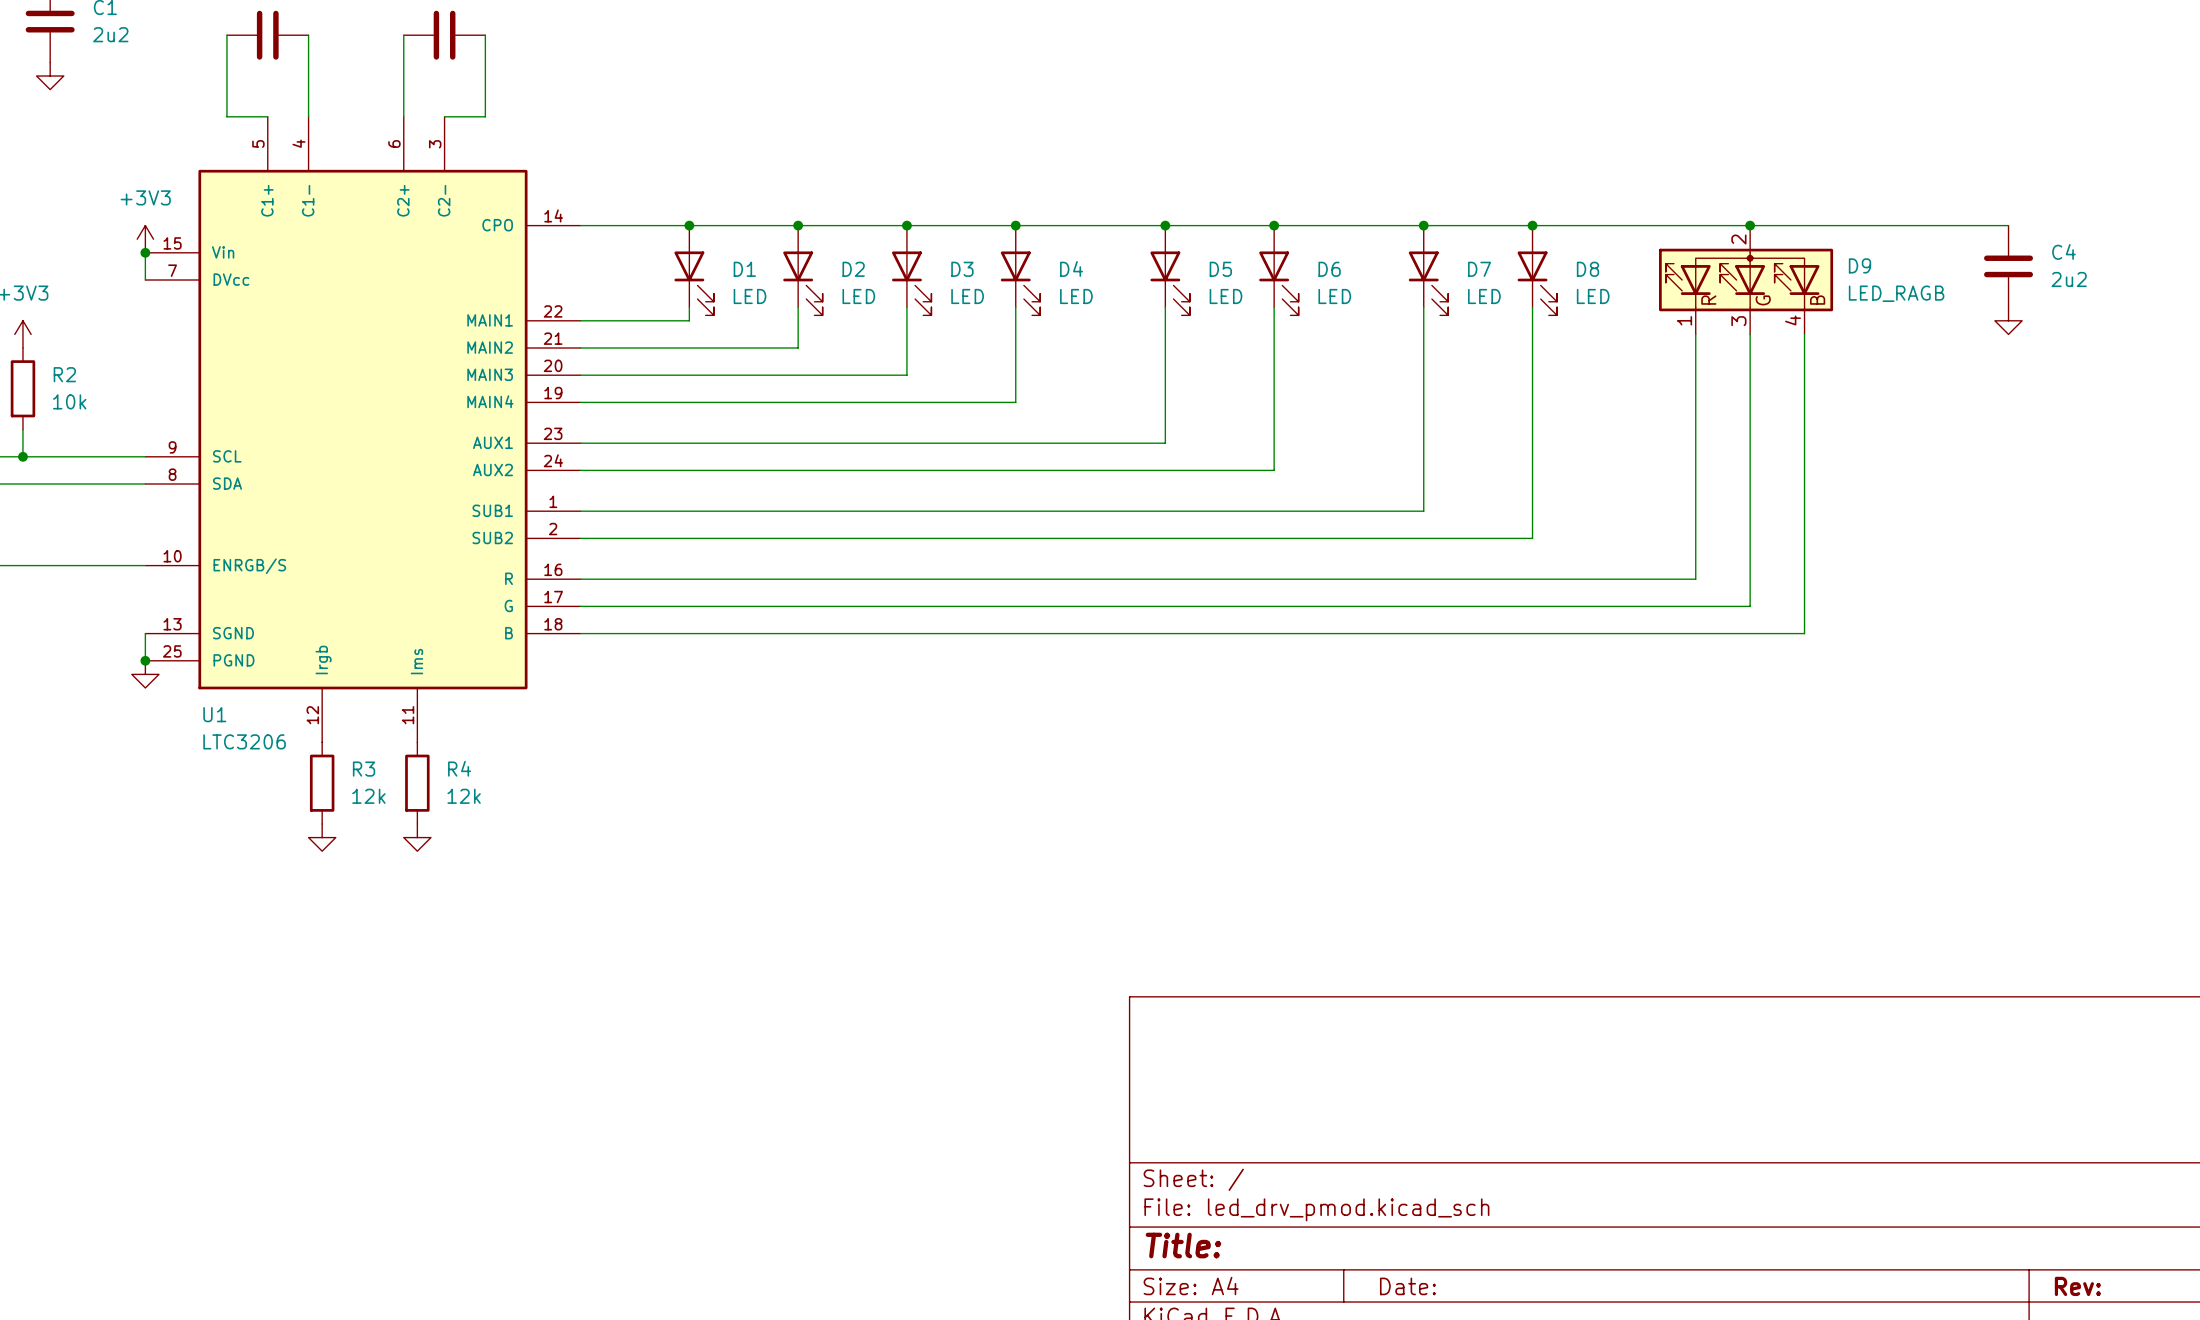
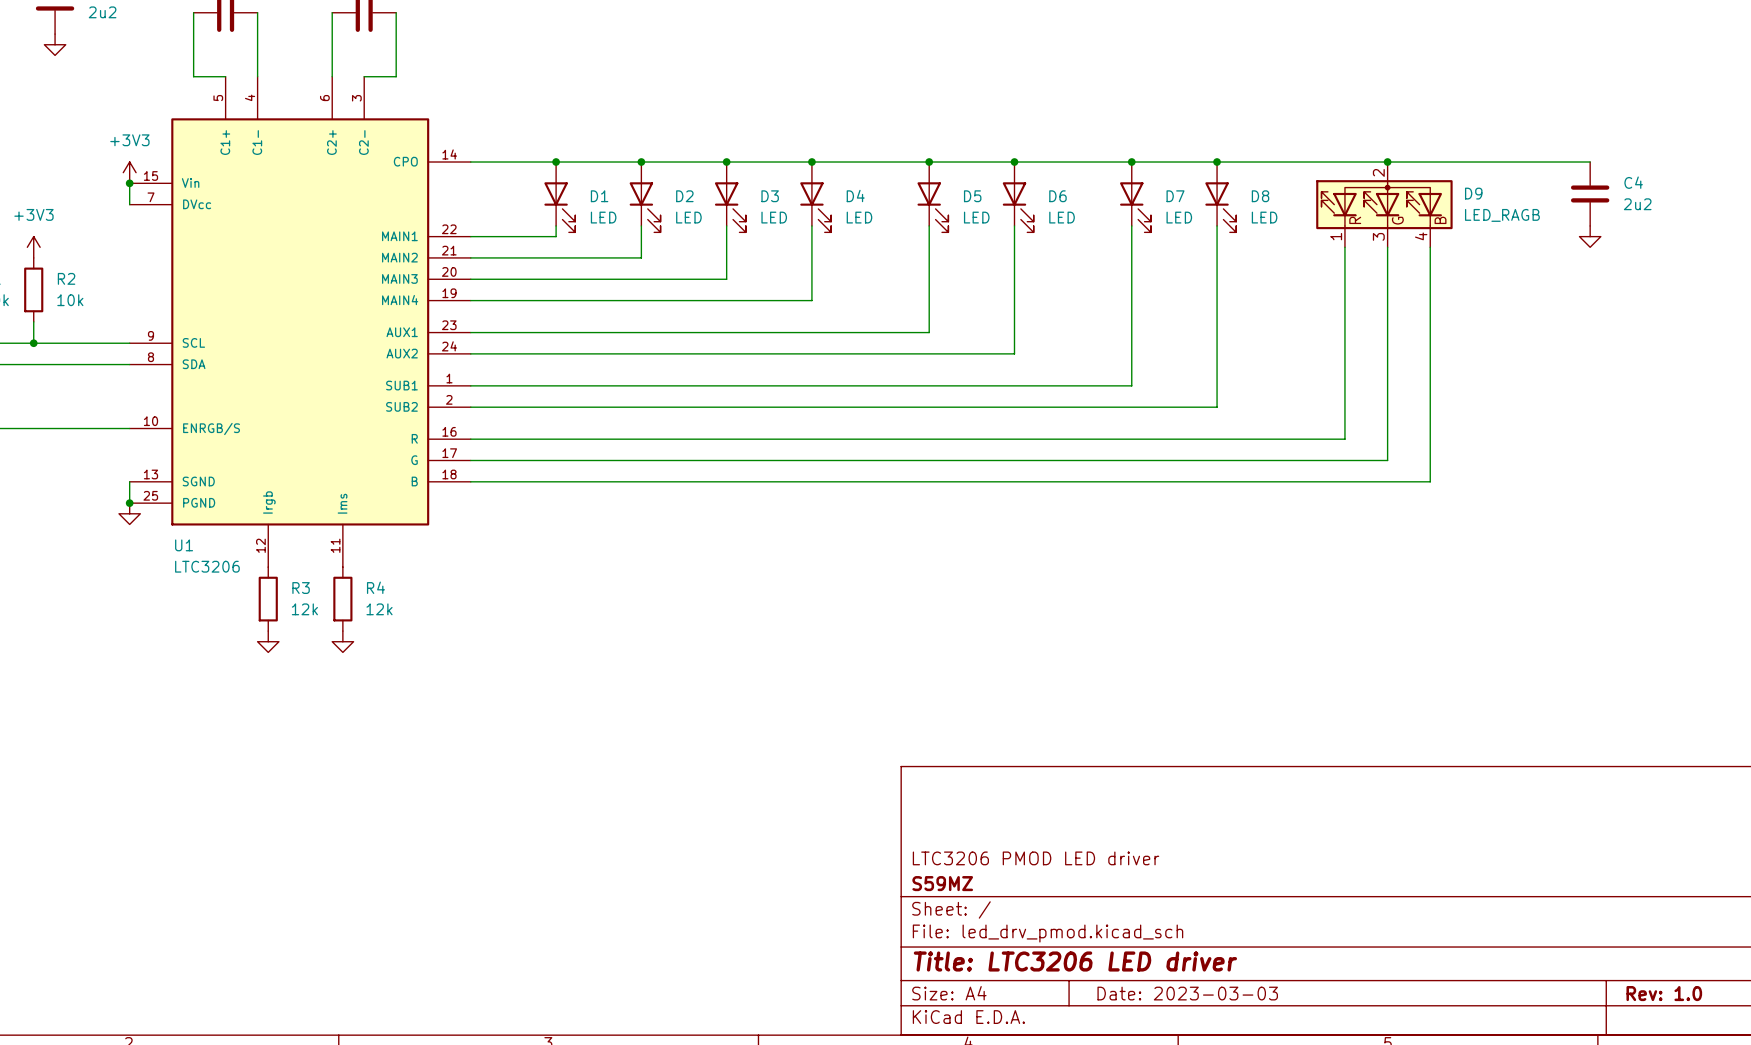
title block: none -> LTC3206 PMOD LED driver (1036, 858)
title block: none -> S59MZ (942, 883)
title block: Title: (1183, 1245) -> Title: LTC3206 LED driver (1075, 961)
title block: Date: (1407, 1286) -> Date: 2023-03-03 (1187, 993)
title block: Rev: (2077, 1286) -> Rev: 1.0 (1664, 993)

